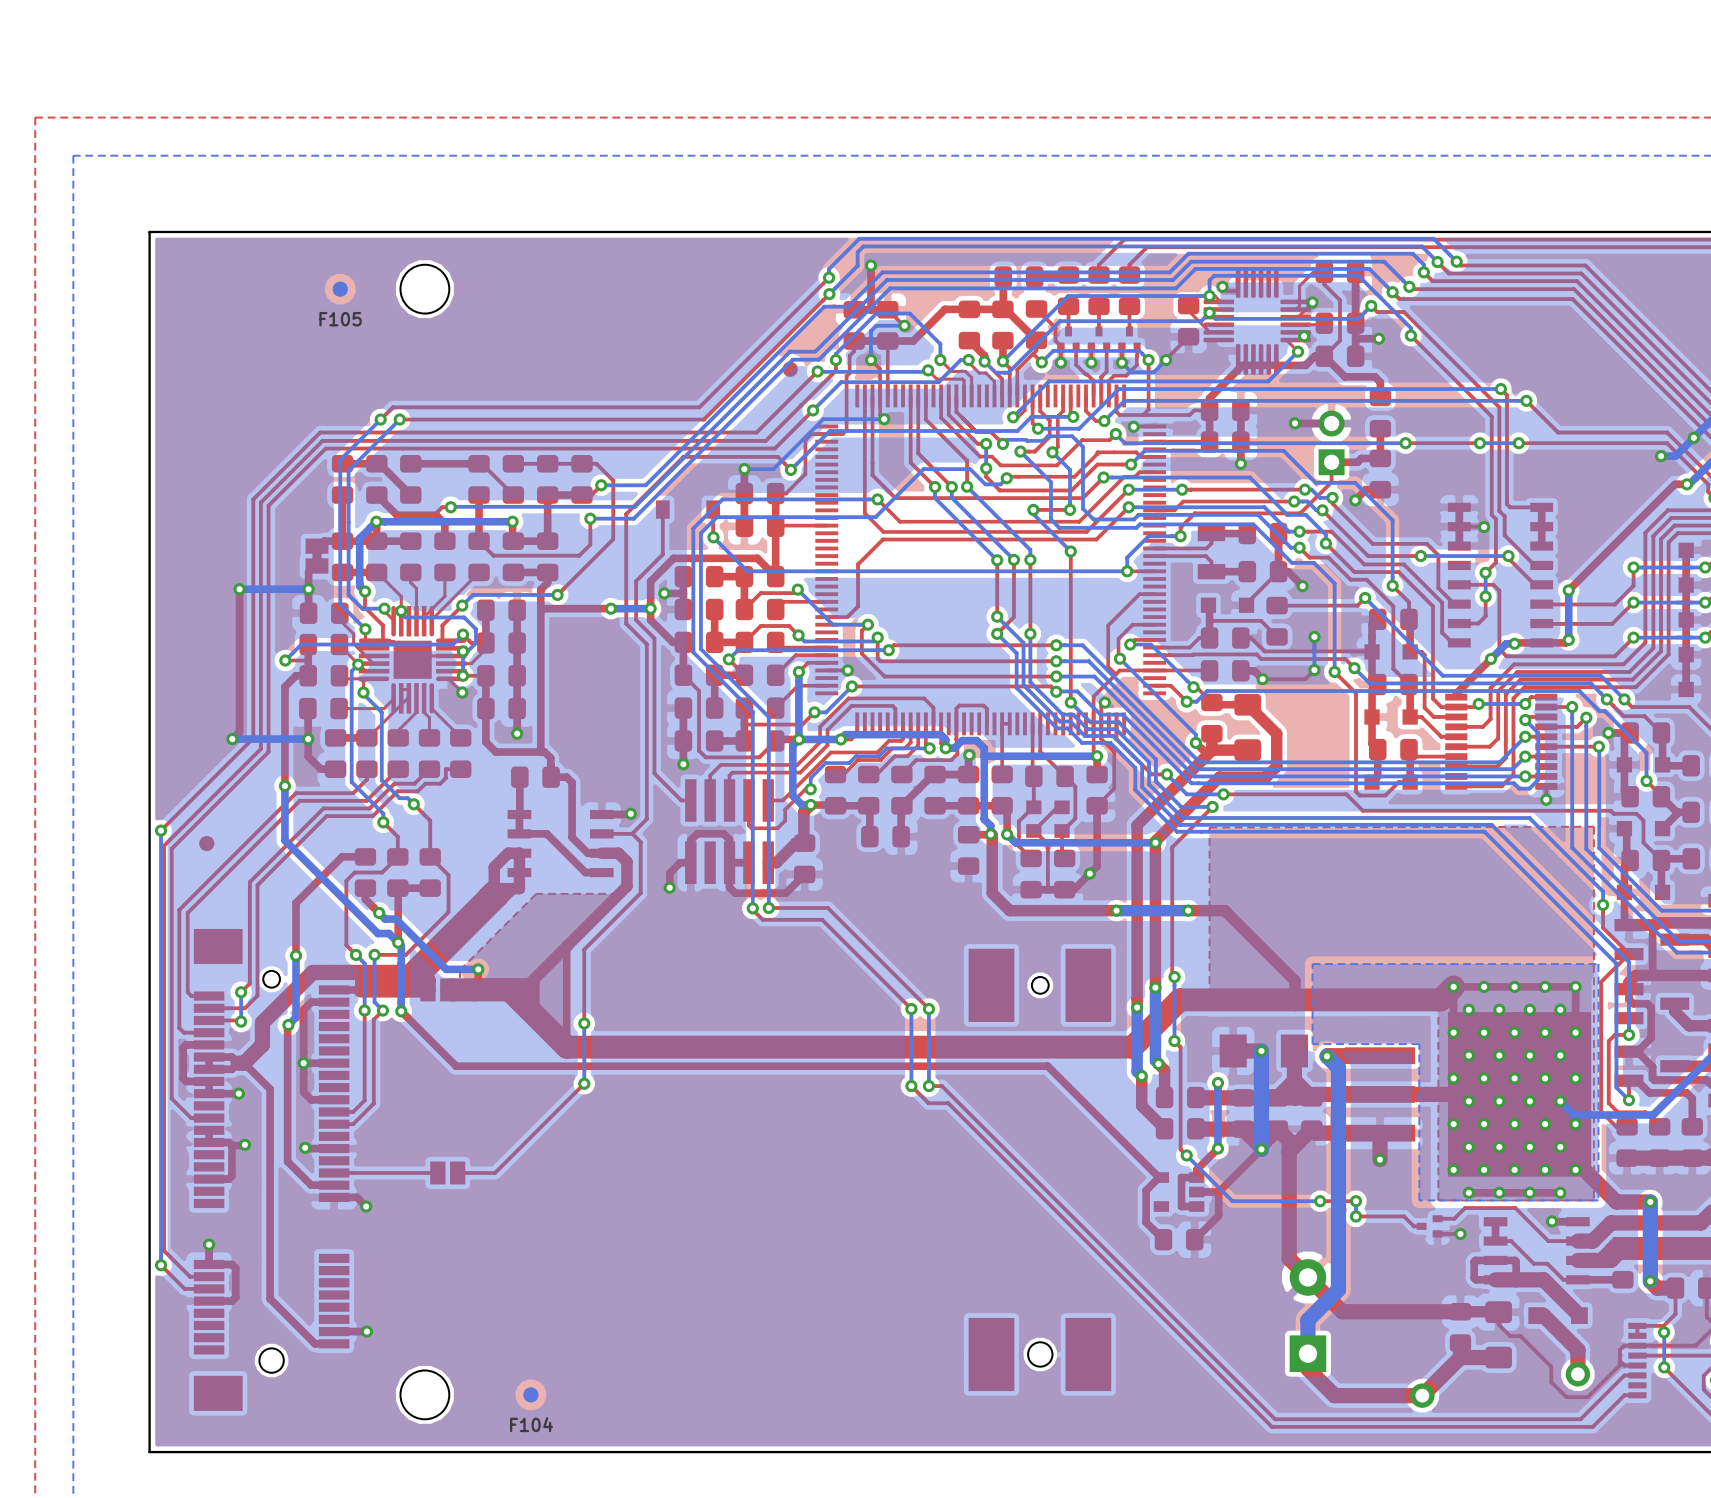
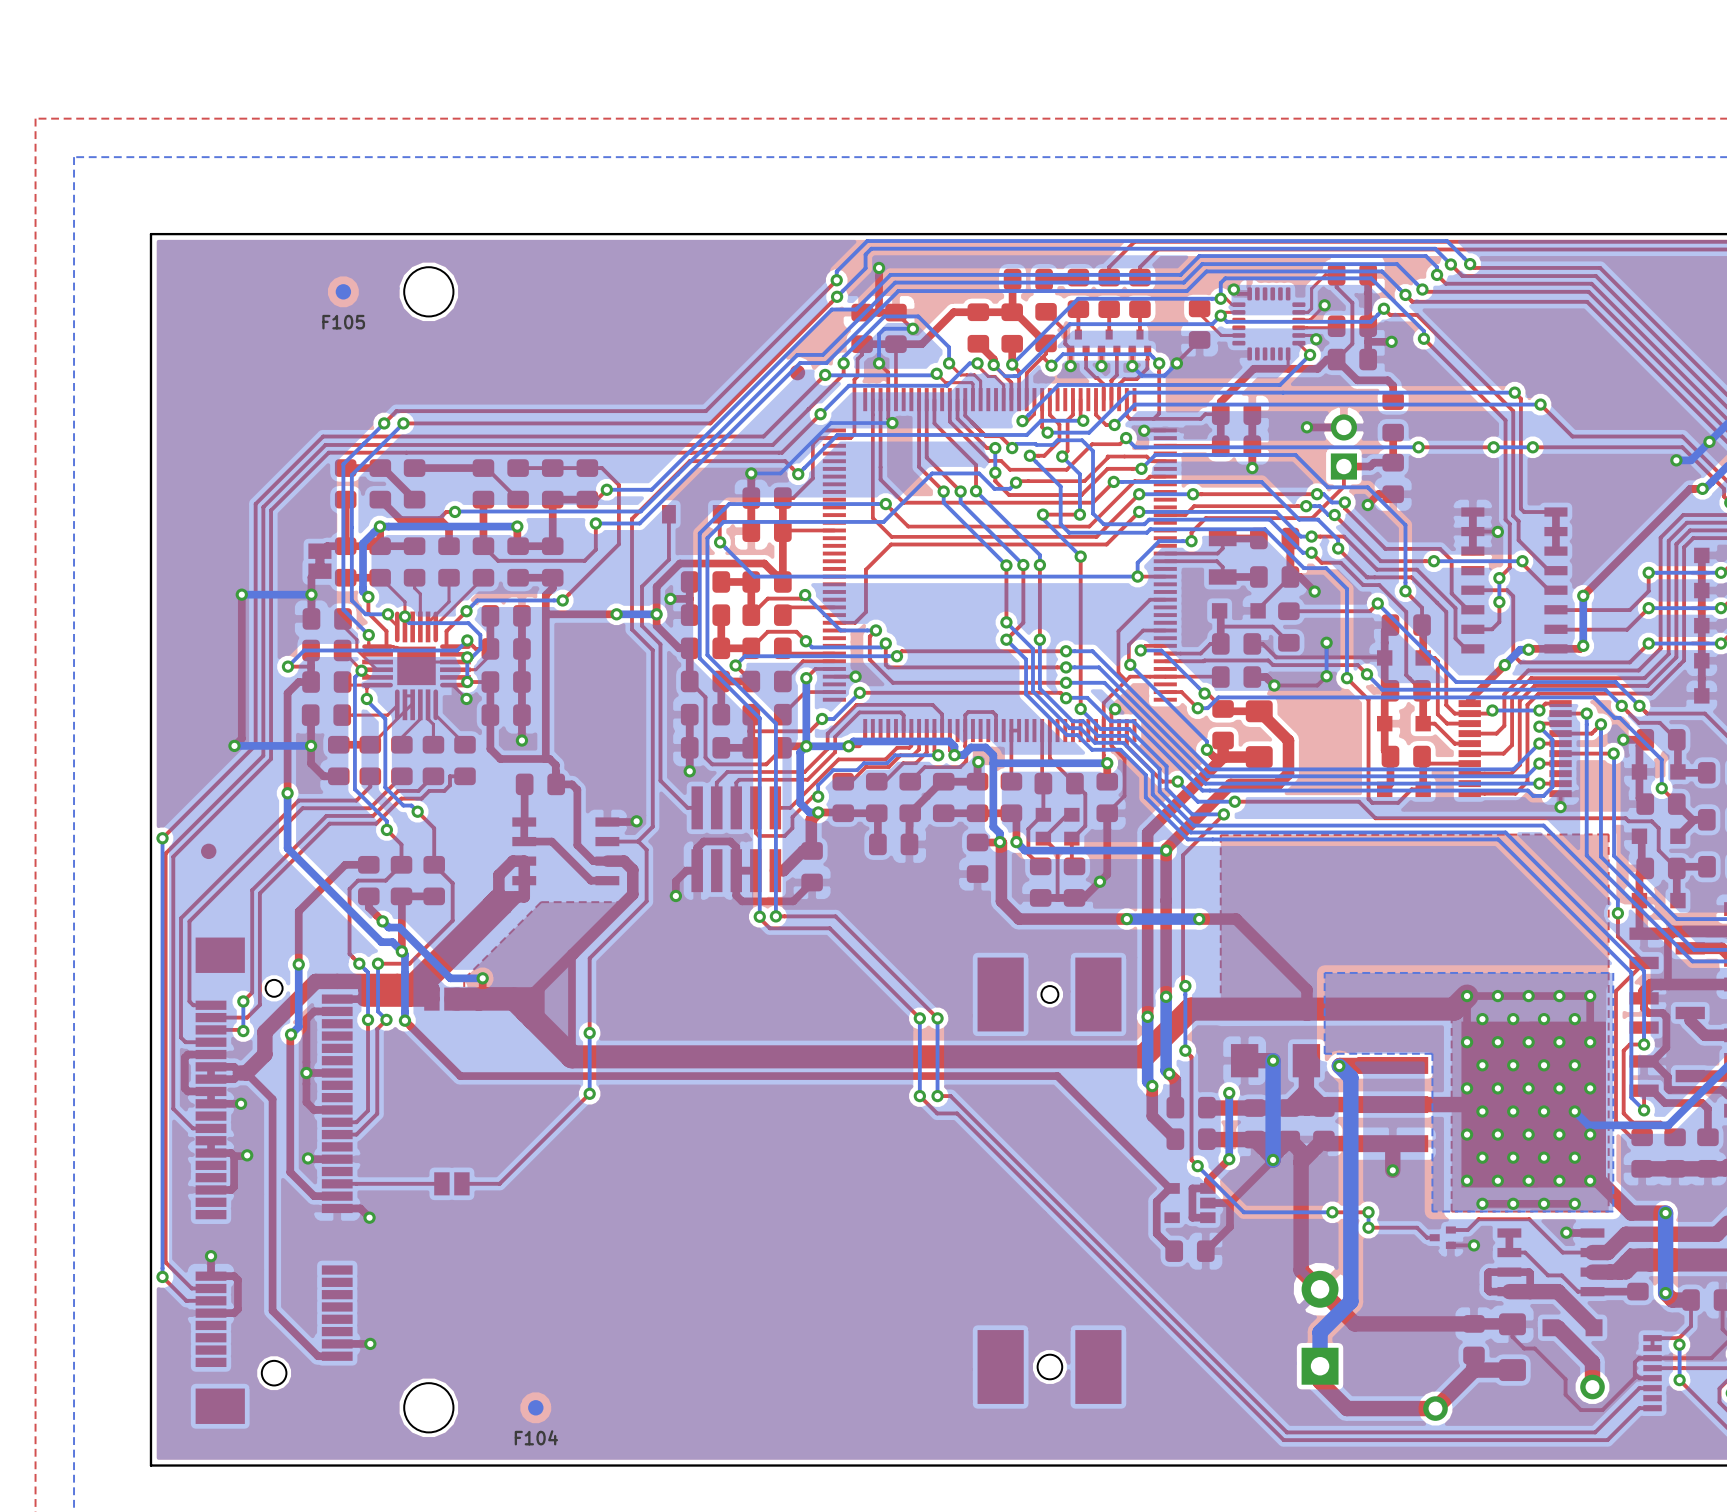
part footprint: [1203, 267, 1311, 375] -> [1232, 287, 1306, 361]

